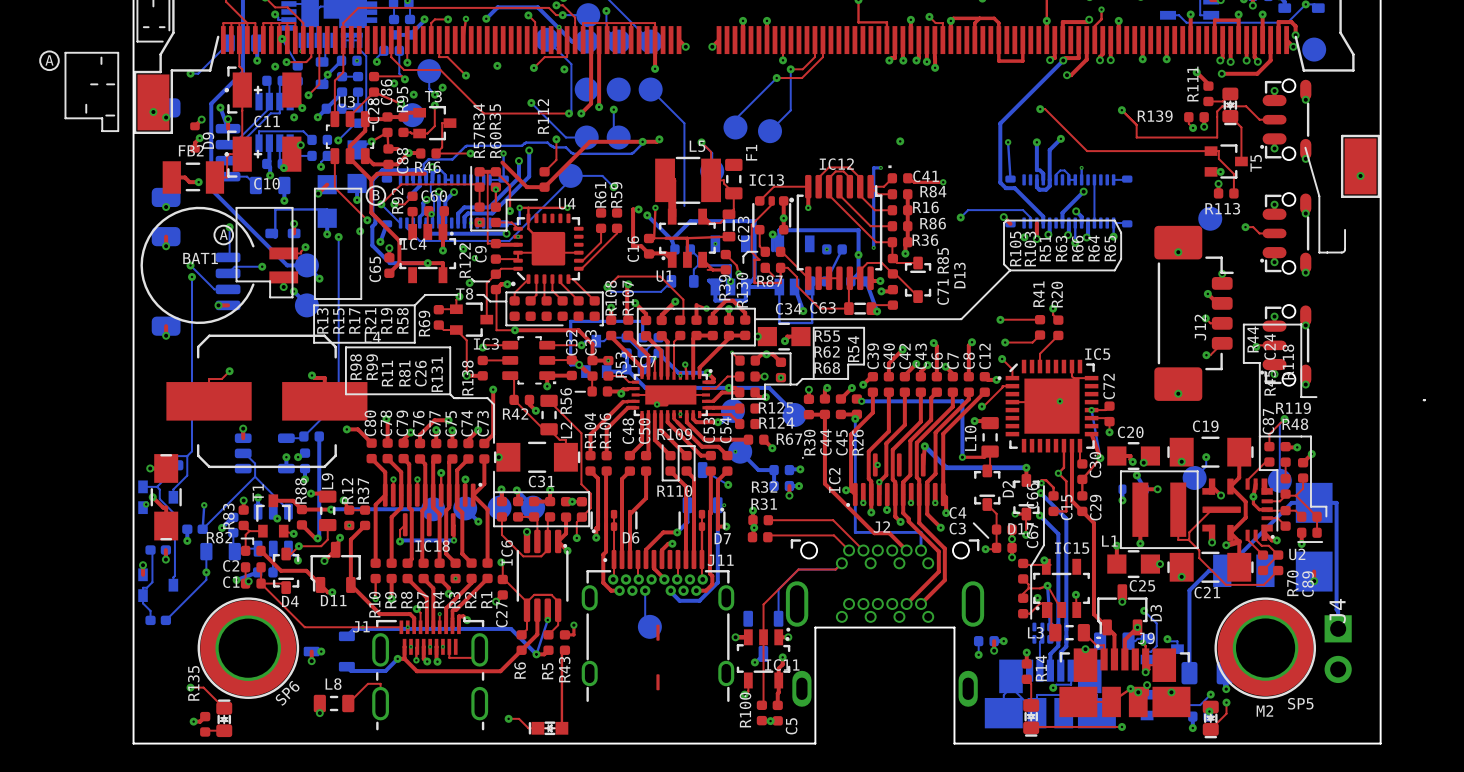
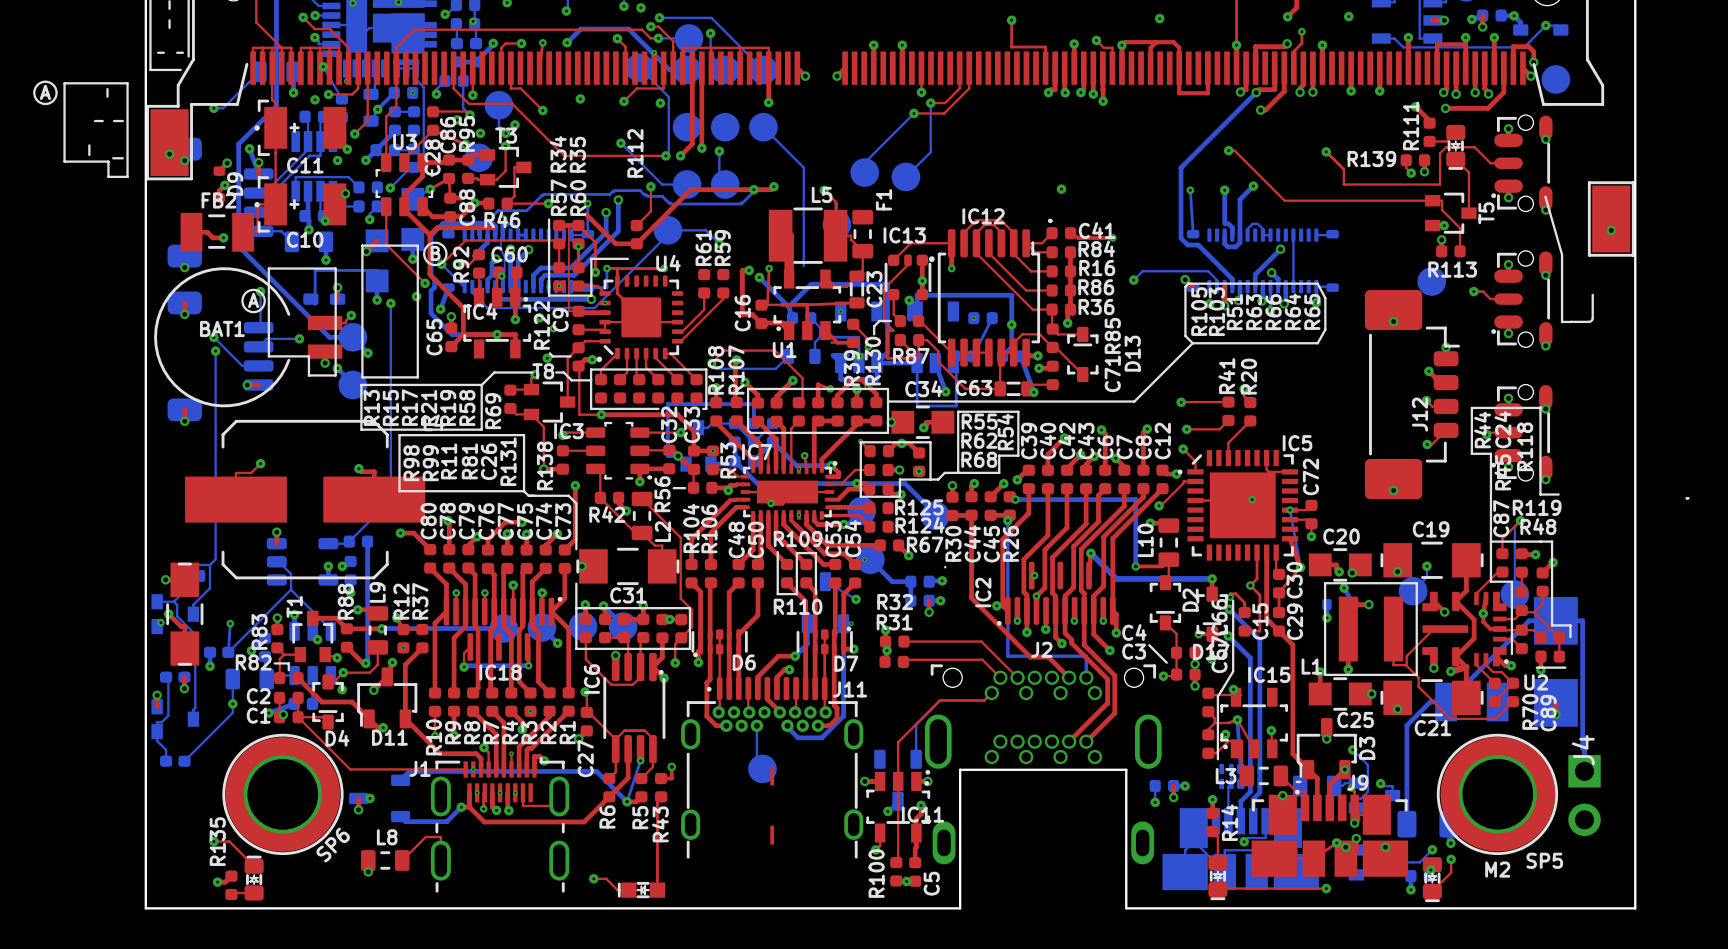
bottom track: (880, 167) (873, 167) (873, 247) -> none
via: (880, 167) -> none
bottom track: (1081, 167) (1081, 179) -> none
via: (1081, 167) -> none
via: (873, 247) -> none

